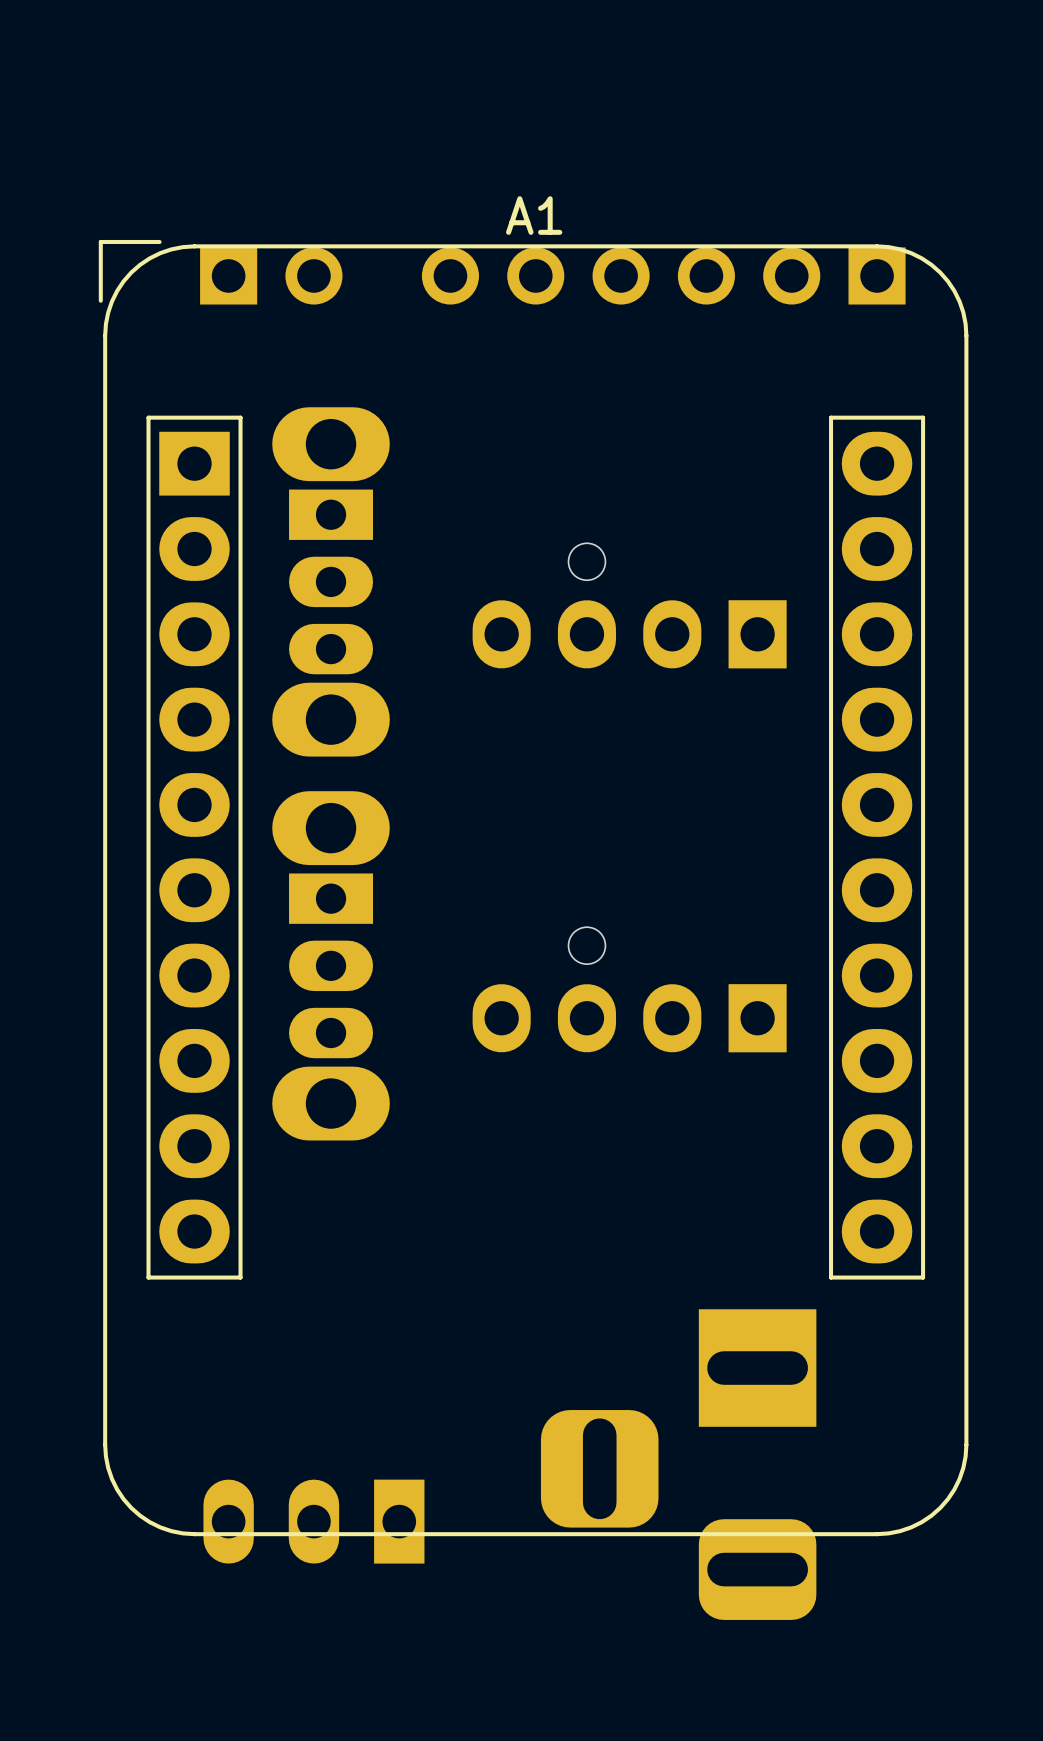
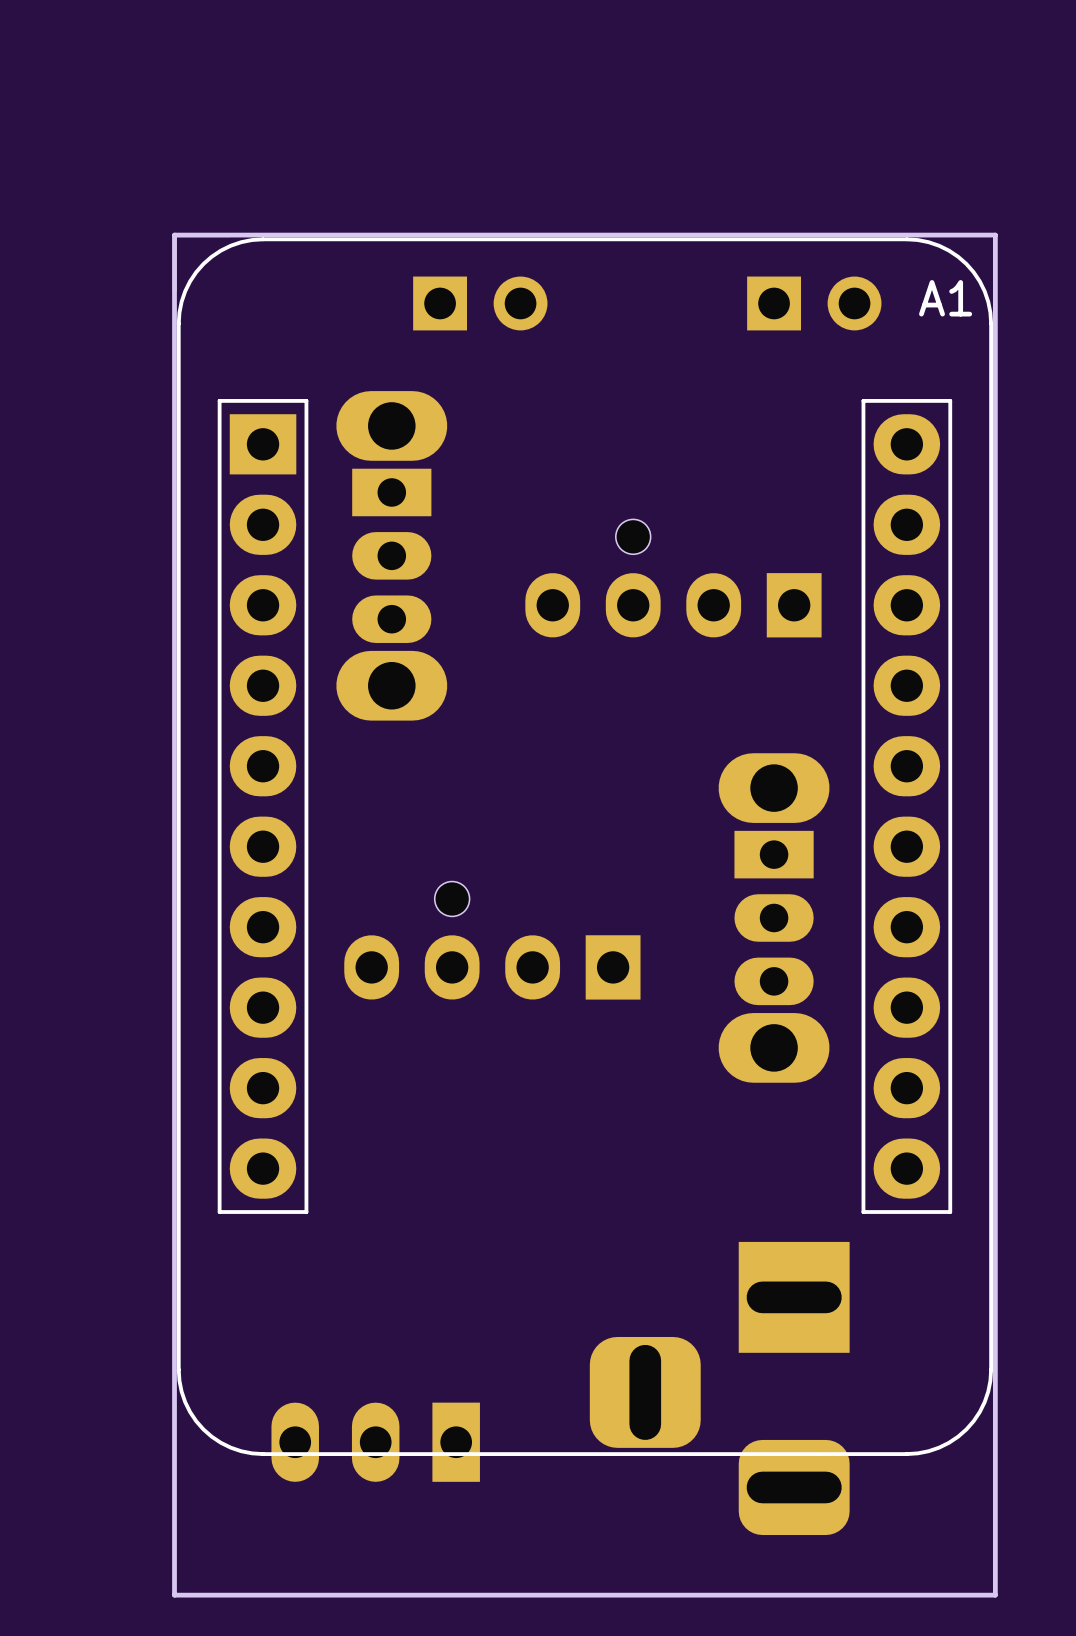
A1 name position: A1 (534, 215) -> A1 (945, 298)
board edge: none -> (995, 235) (995, 1595) (174, 1595) (174, 235) (995, 235)
part position: (271, 275) -> (480, 303)
part: (663, 275) -> none
part: none -> (814, 303)
part position: (331, 965) -> (774, 917)
part position: (629, 989) -> (492, 940)

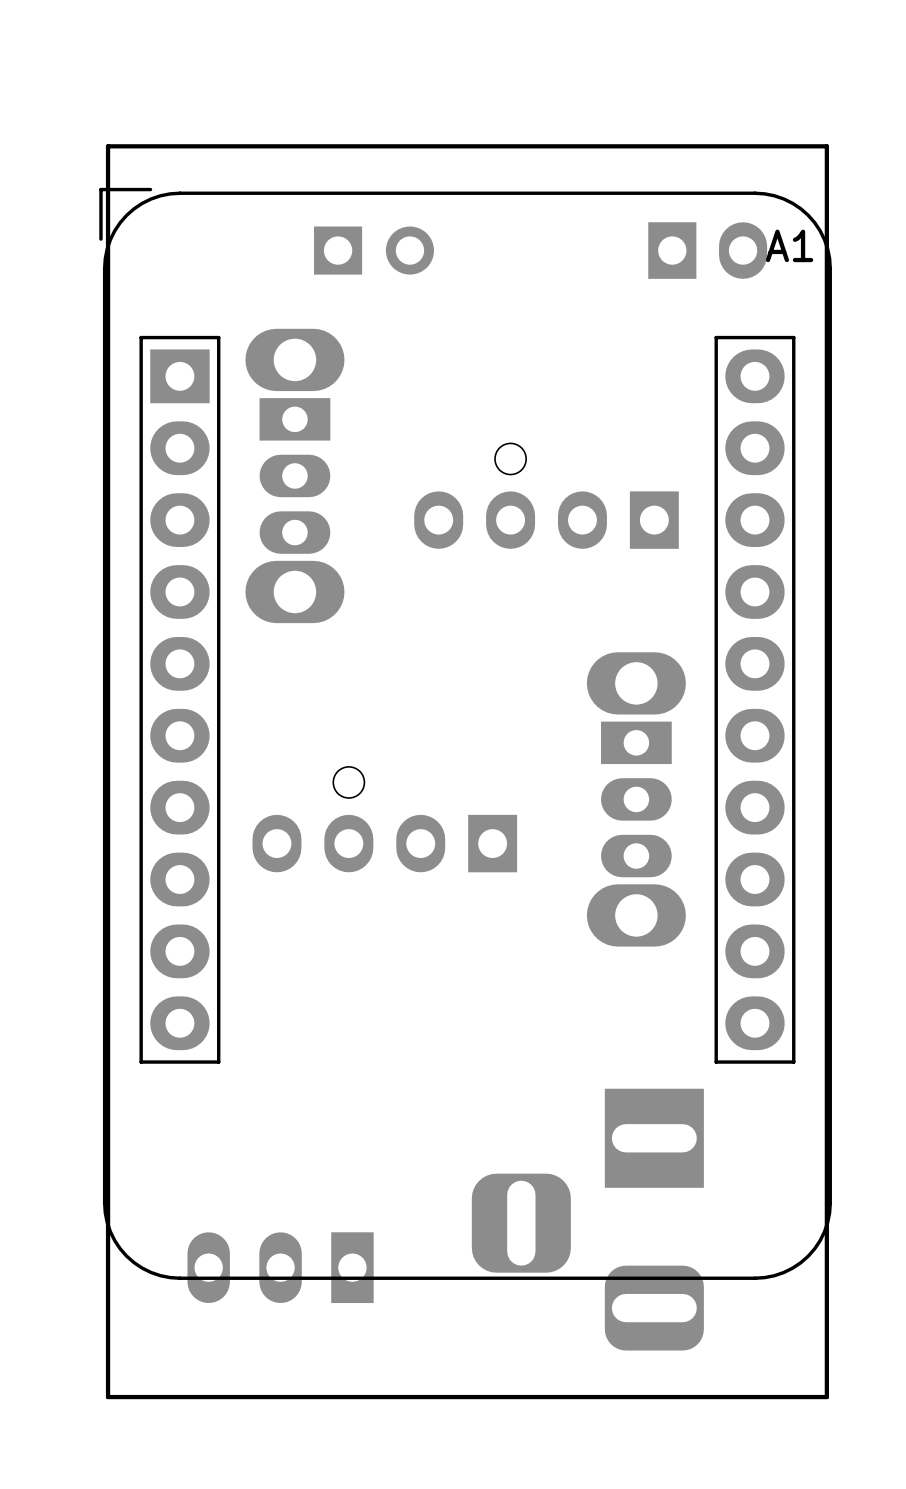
board edge: (995, 235) (995, 1595) (174, 1595) (174, 235) (995, 235) -> (826, 146) (826, 1397) (108, 1397) (108, 146) (826, 146)
part: (814, 303) -> none
part: none -> (707, 250)

